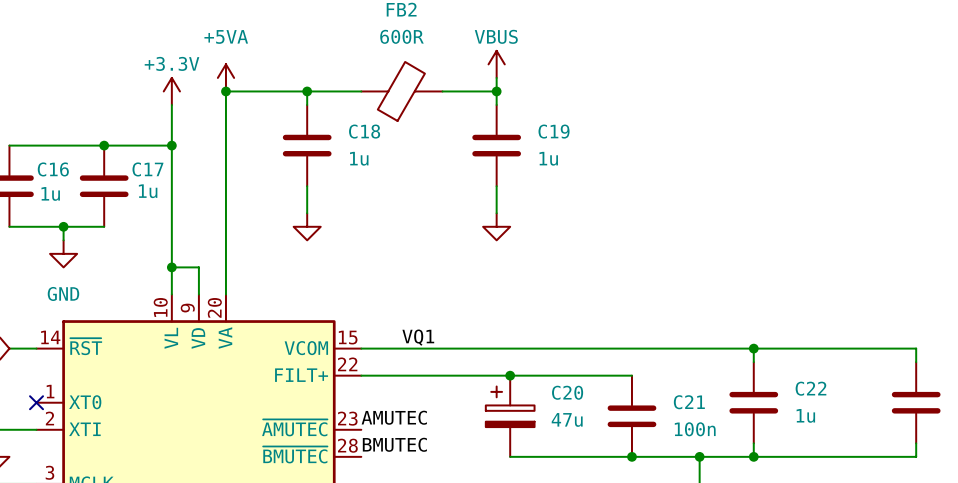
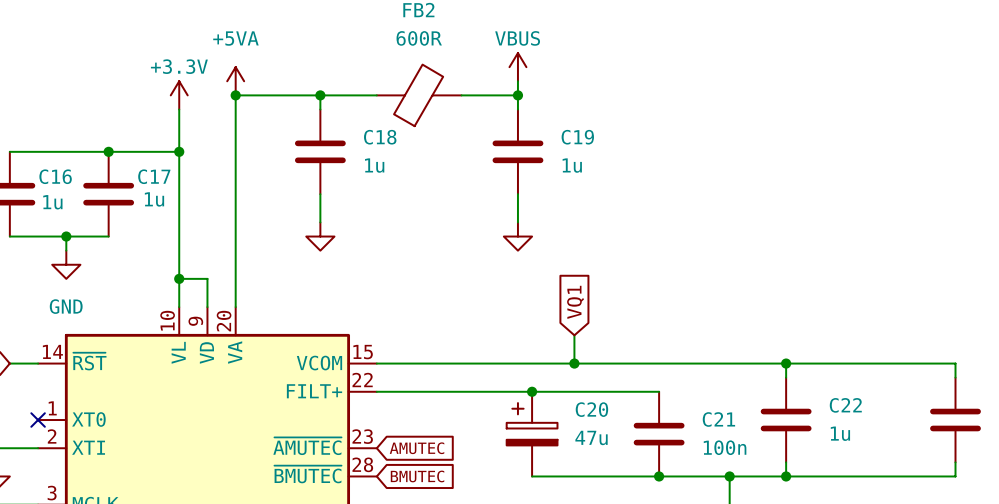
global label: none -> VQ1 (575, 302)
wire: none -> (574, 335) (574, 363)
label: VQ1 (418, 337) -> none
junction: none -> (574, 363)
label: AMUTEC (394, 417) -> none
global label: none -> AMUTEC (417, 448)
label: BMUTEC (394, 444) -> none
global label: none -> BMUTEC (417, 476)

